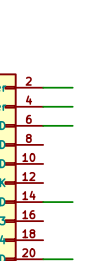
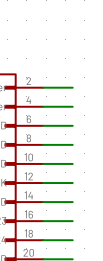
wire: none -> (43, 144) (72, 144)
wire: none -> (43, 163) (72, 163)
wire: none -> (43, 183) (72, 183)
wire: none -> (43, 221) (72, 221)
wire: none -> (43, 240) (72, 240)

